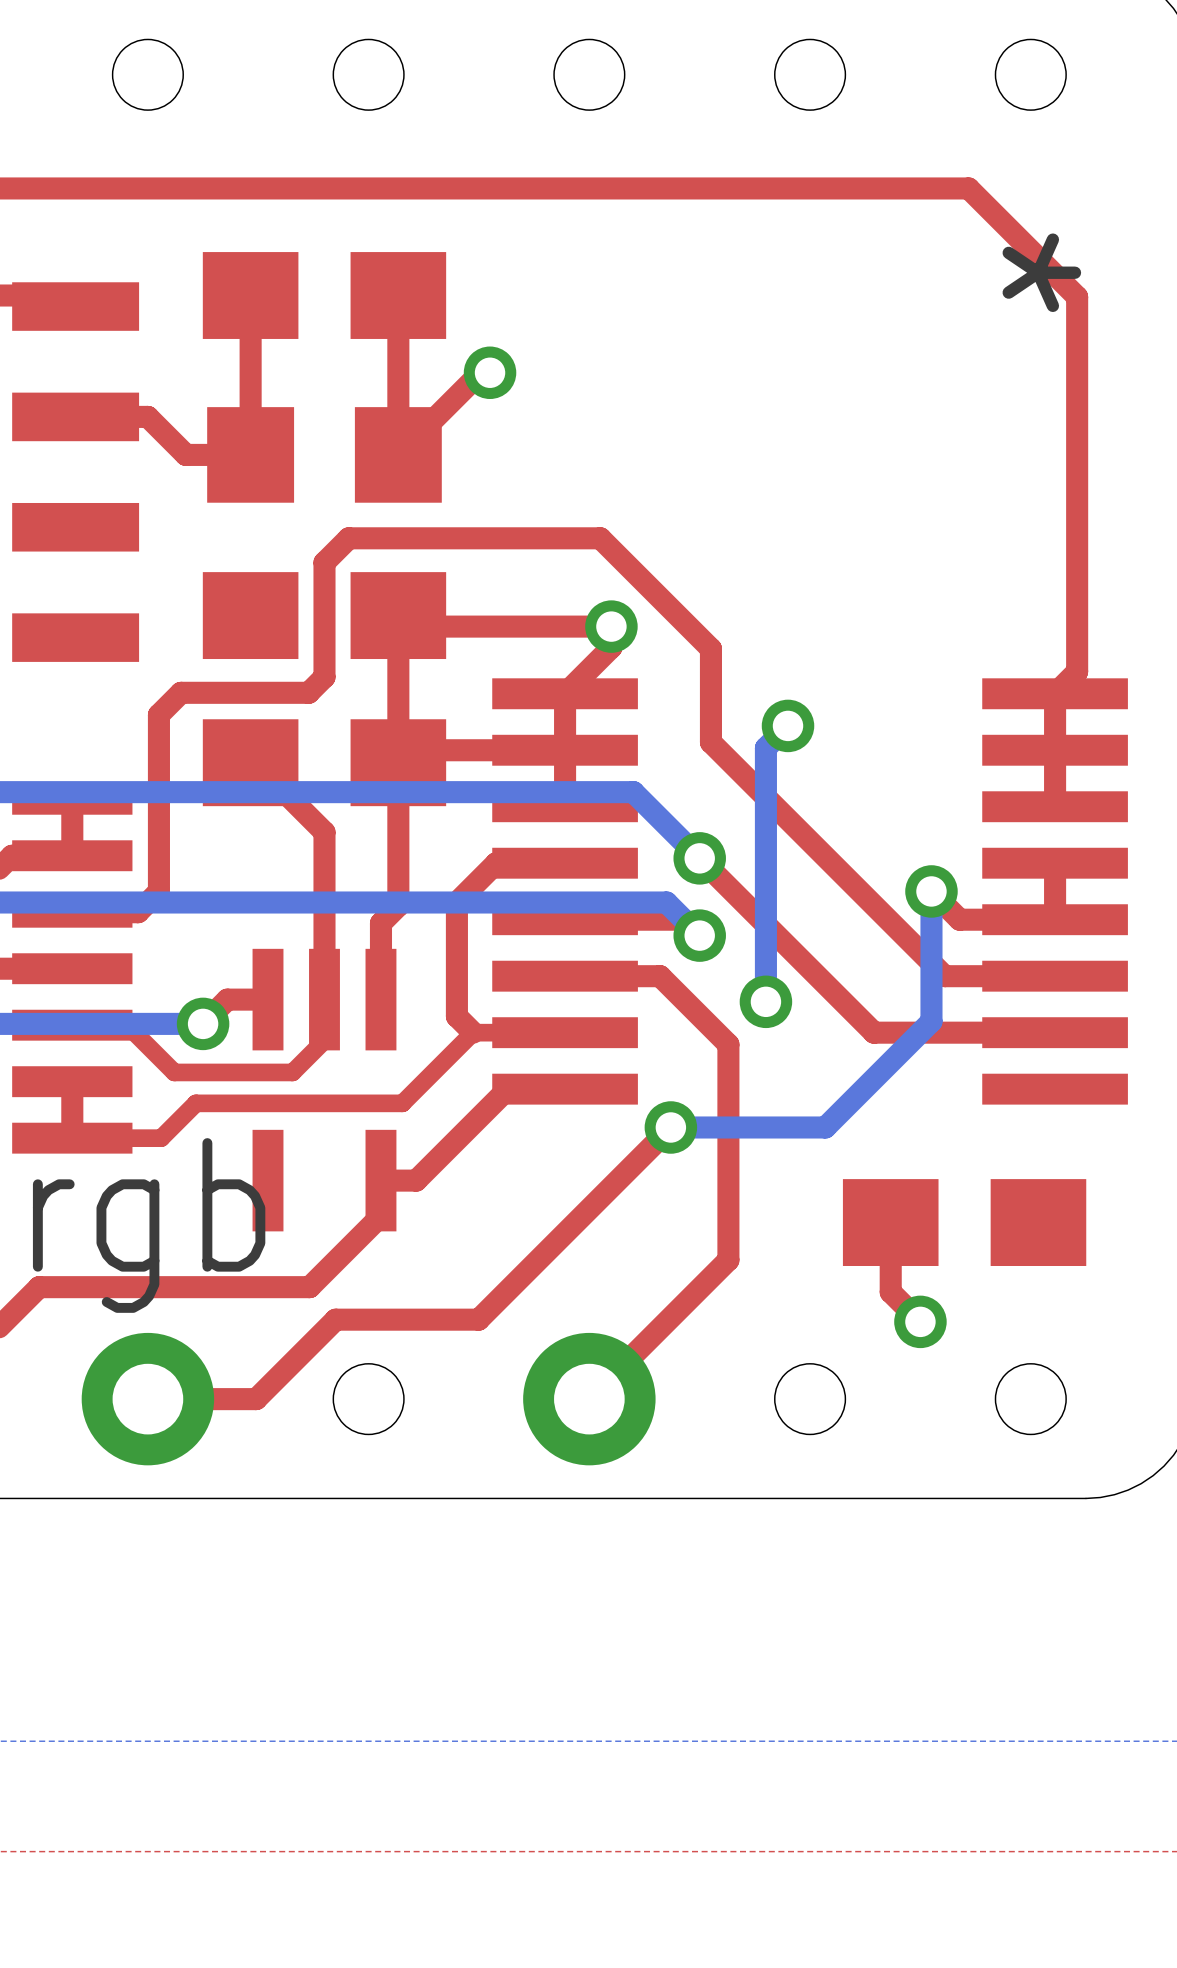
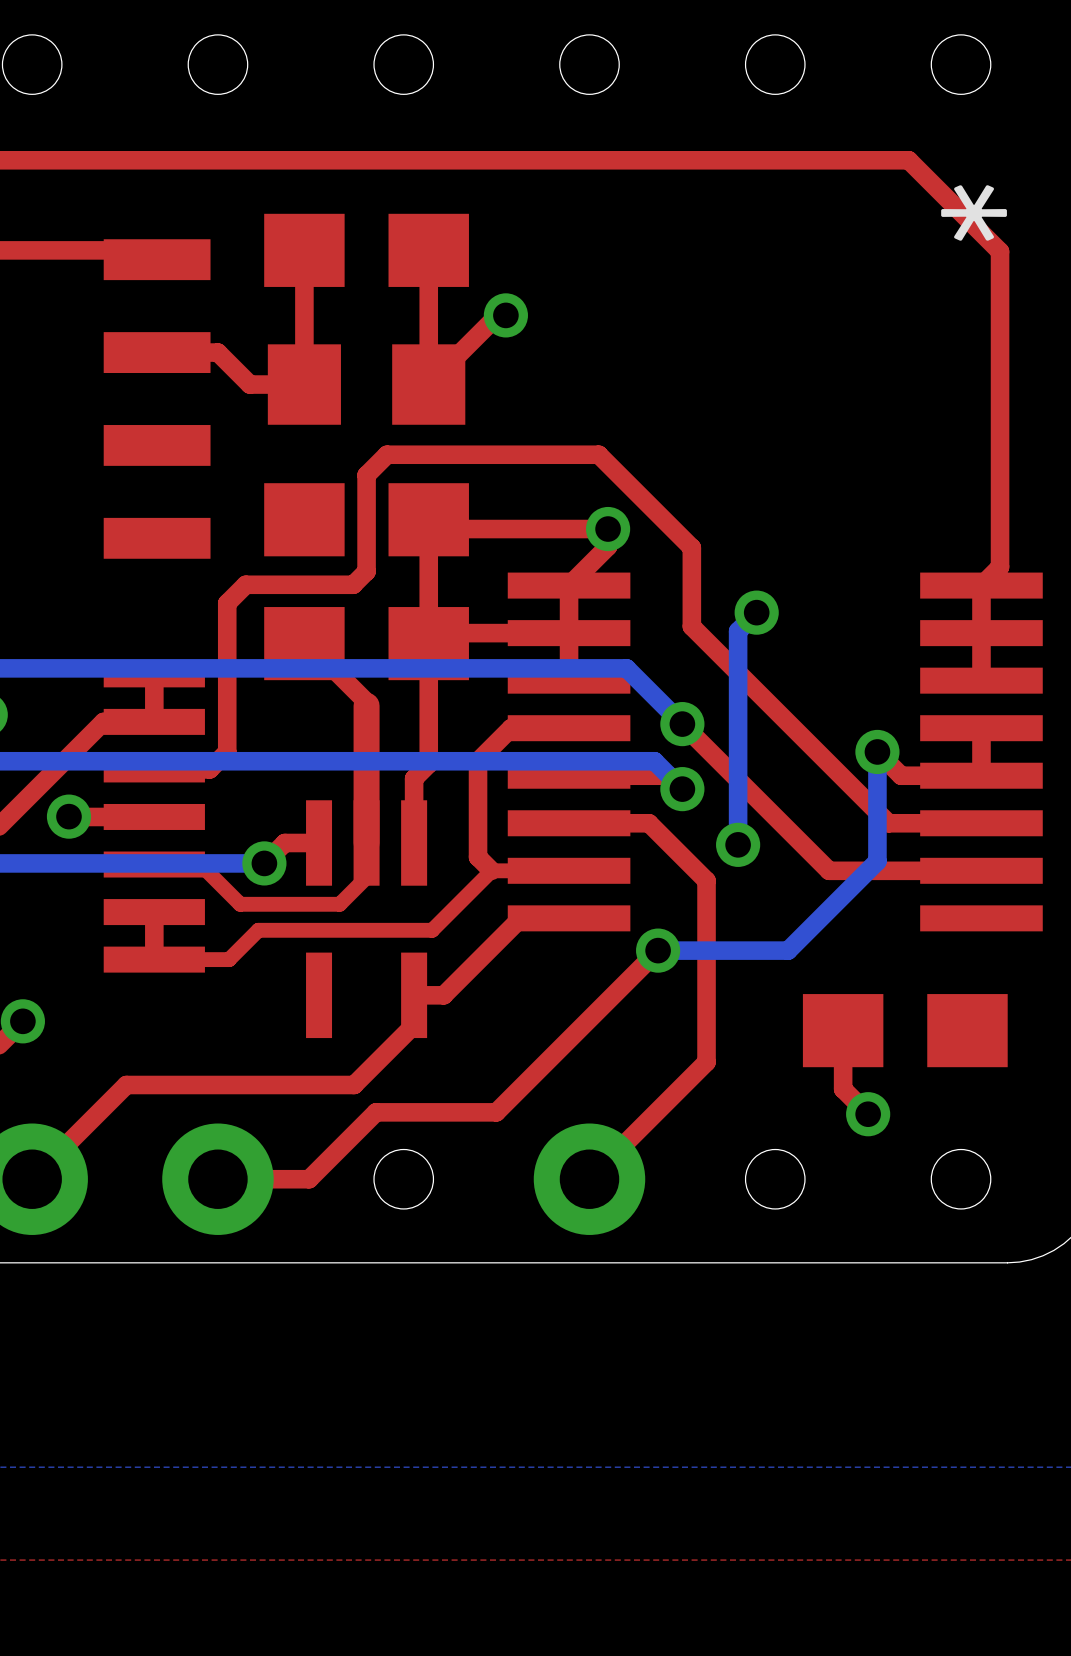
top track width: thin (324, 836) (324, 999) -> thick (366, 705) (366, 842)

